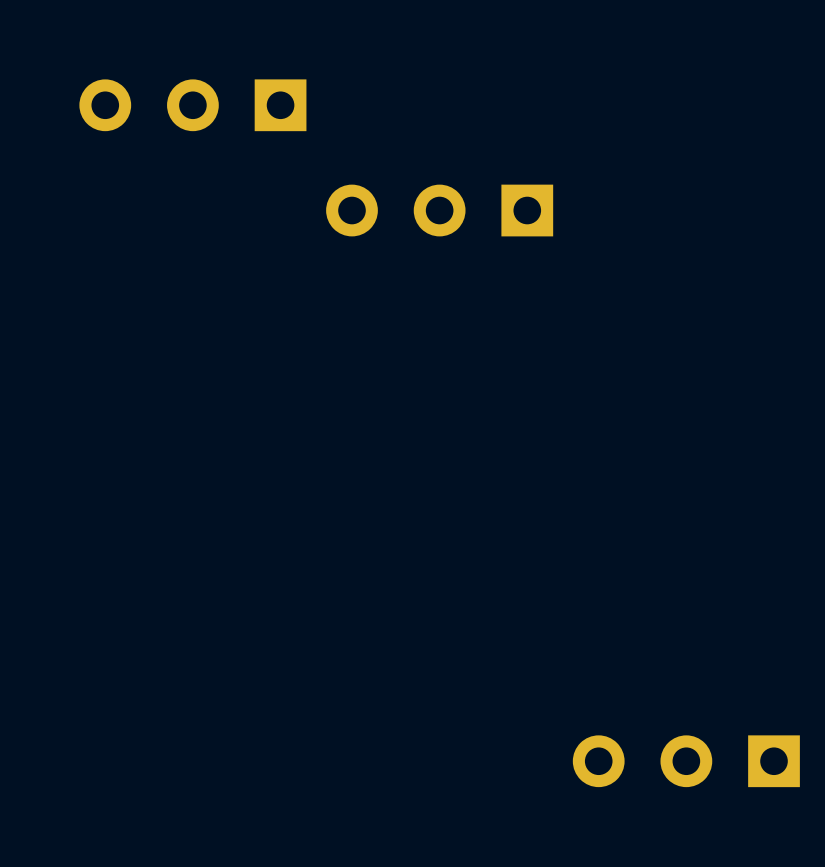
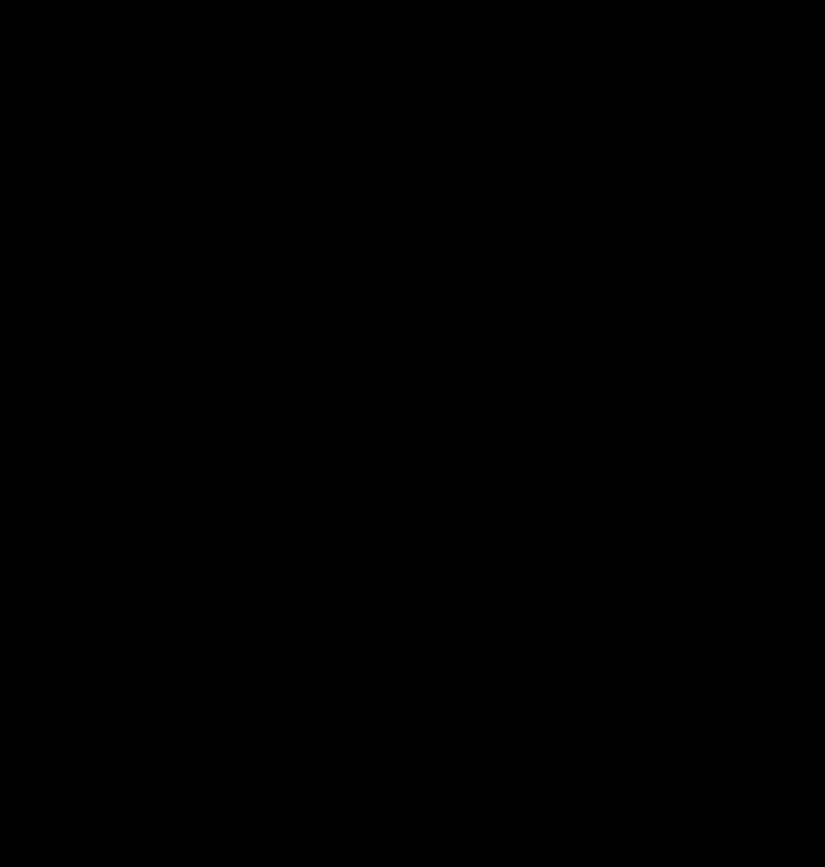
part: (192, 105) -> none
part: (439, 210) -> none
part: (686, 761) -> none

